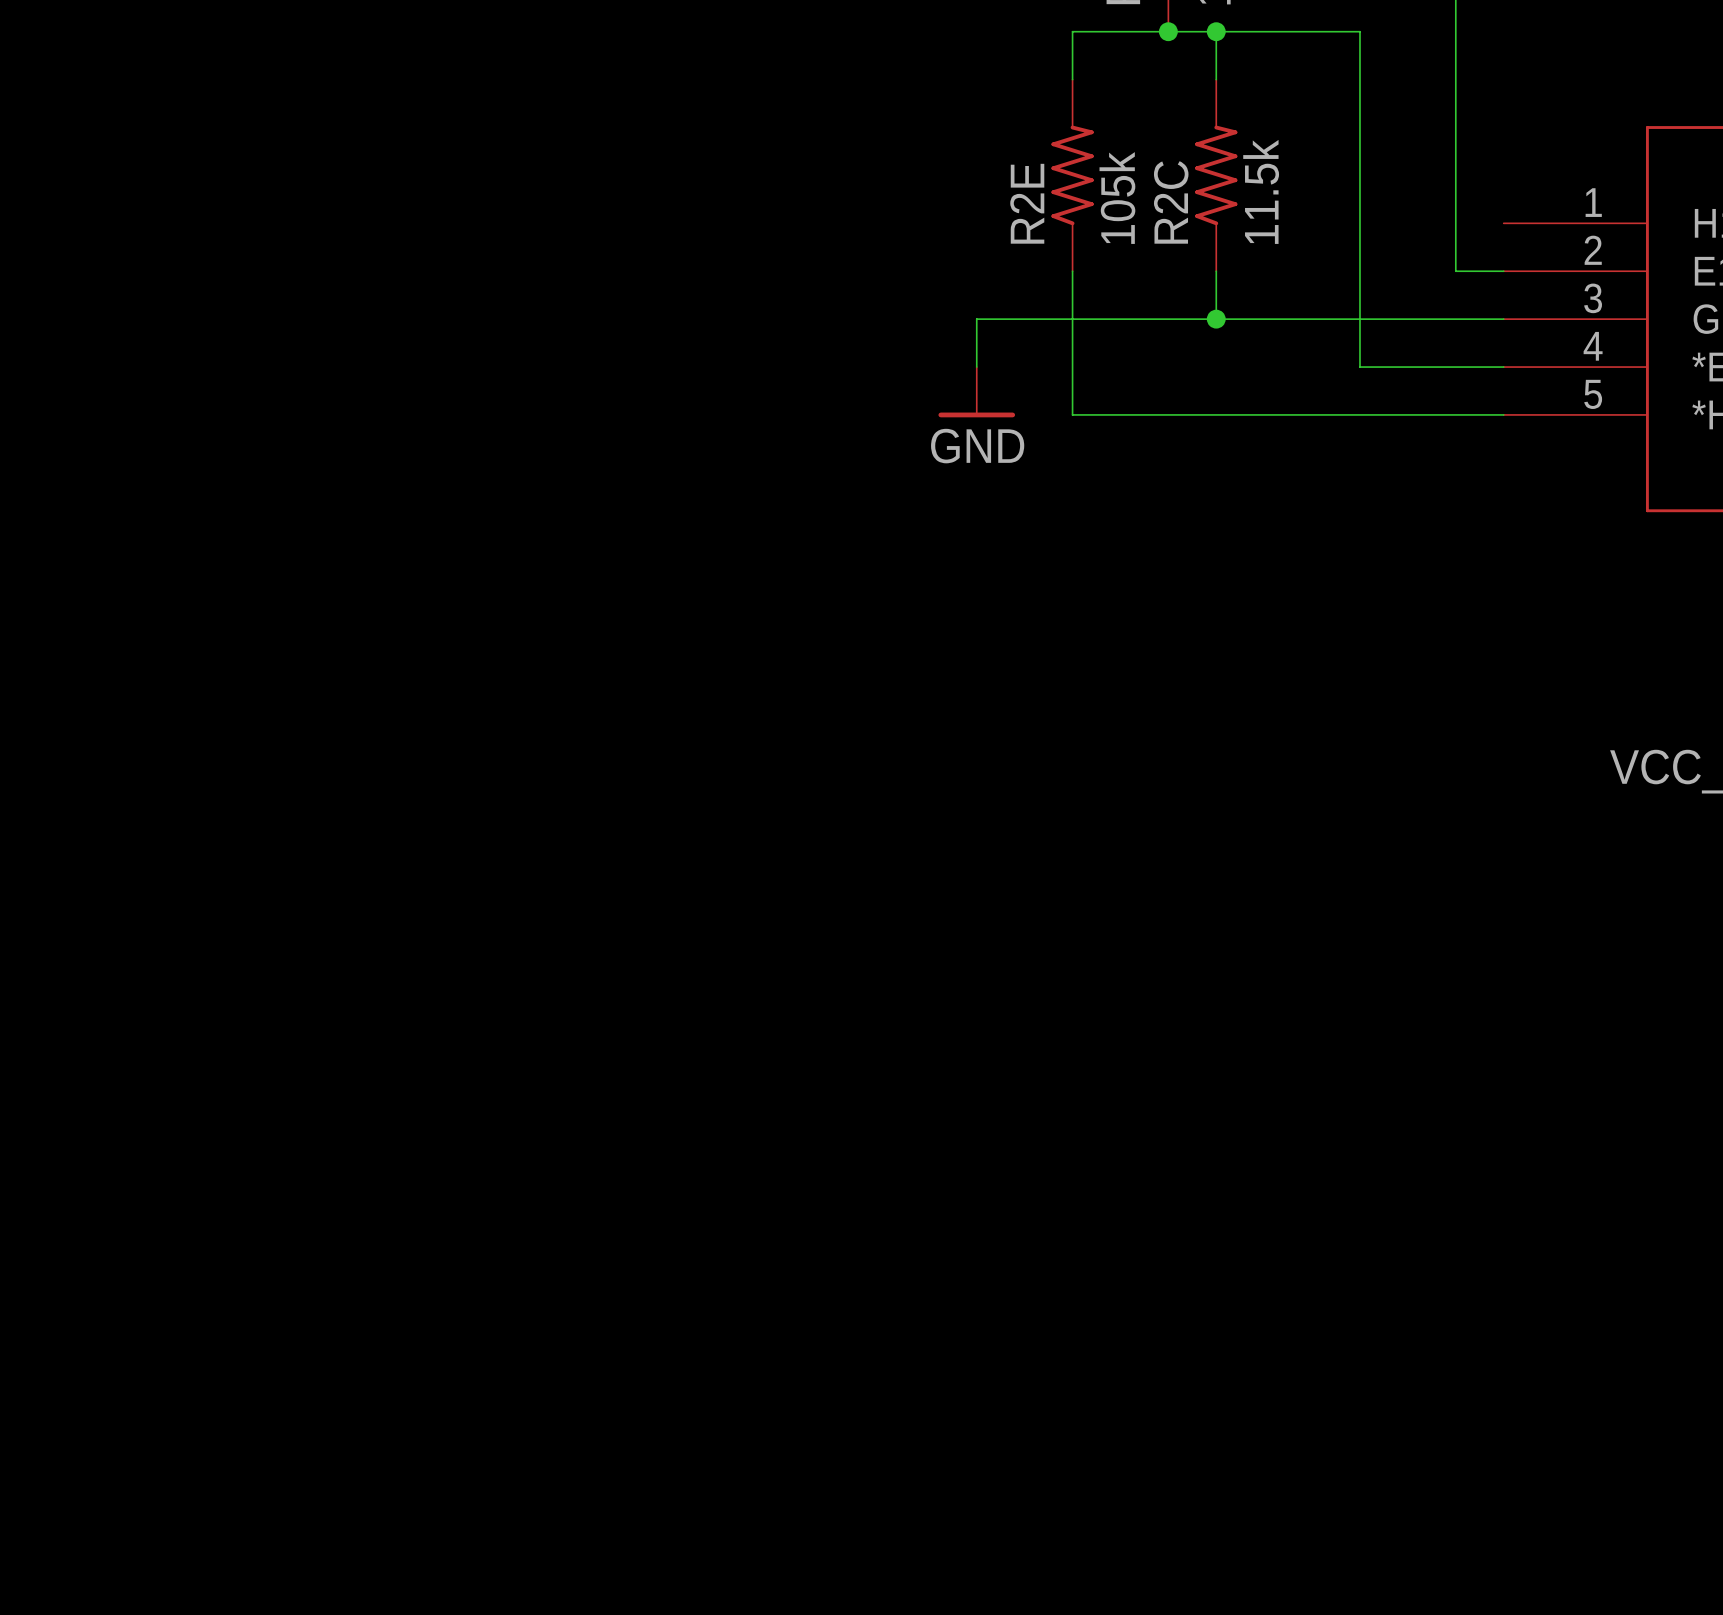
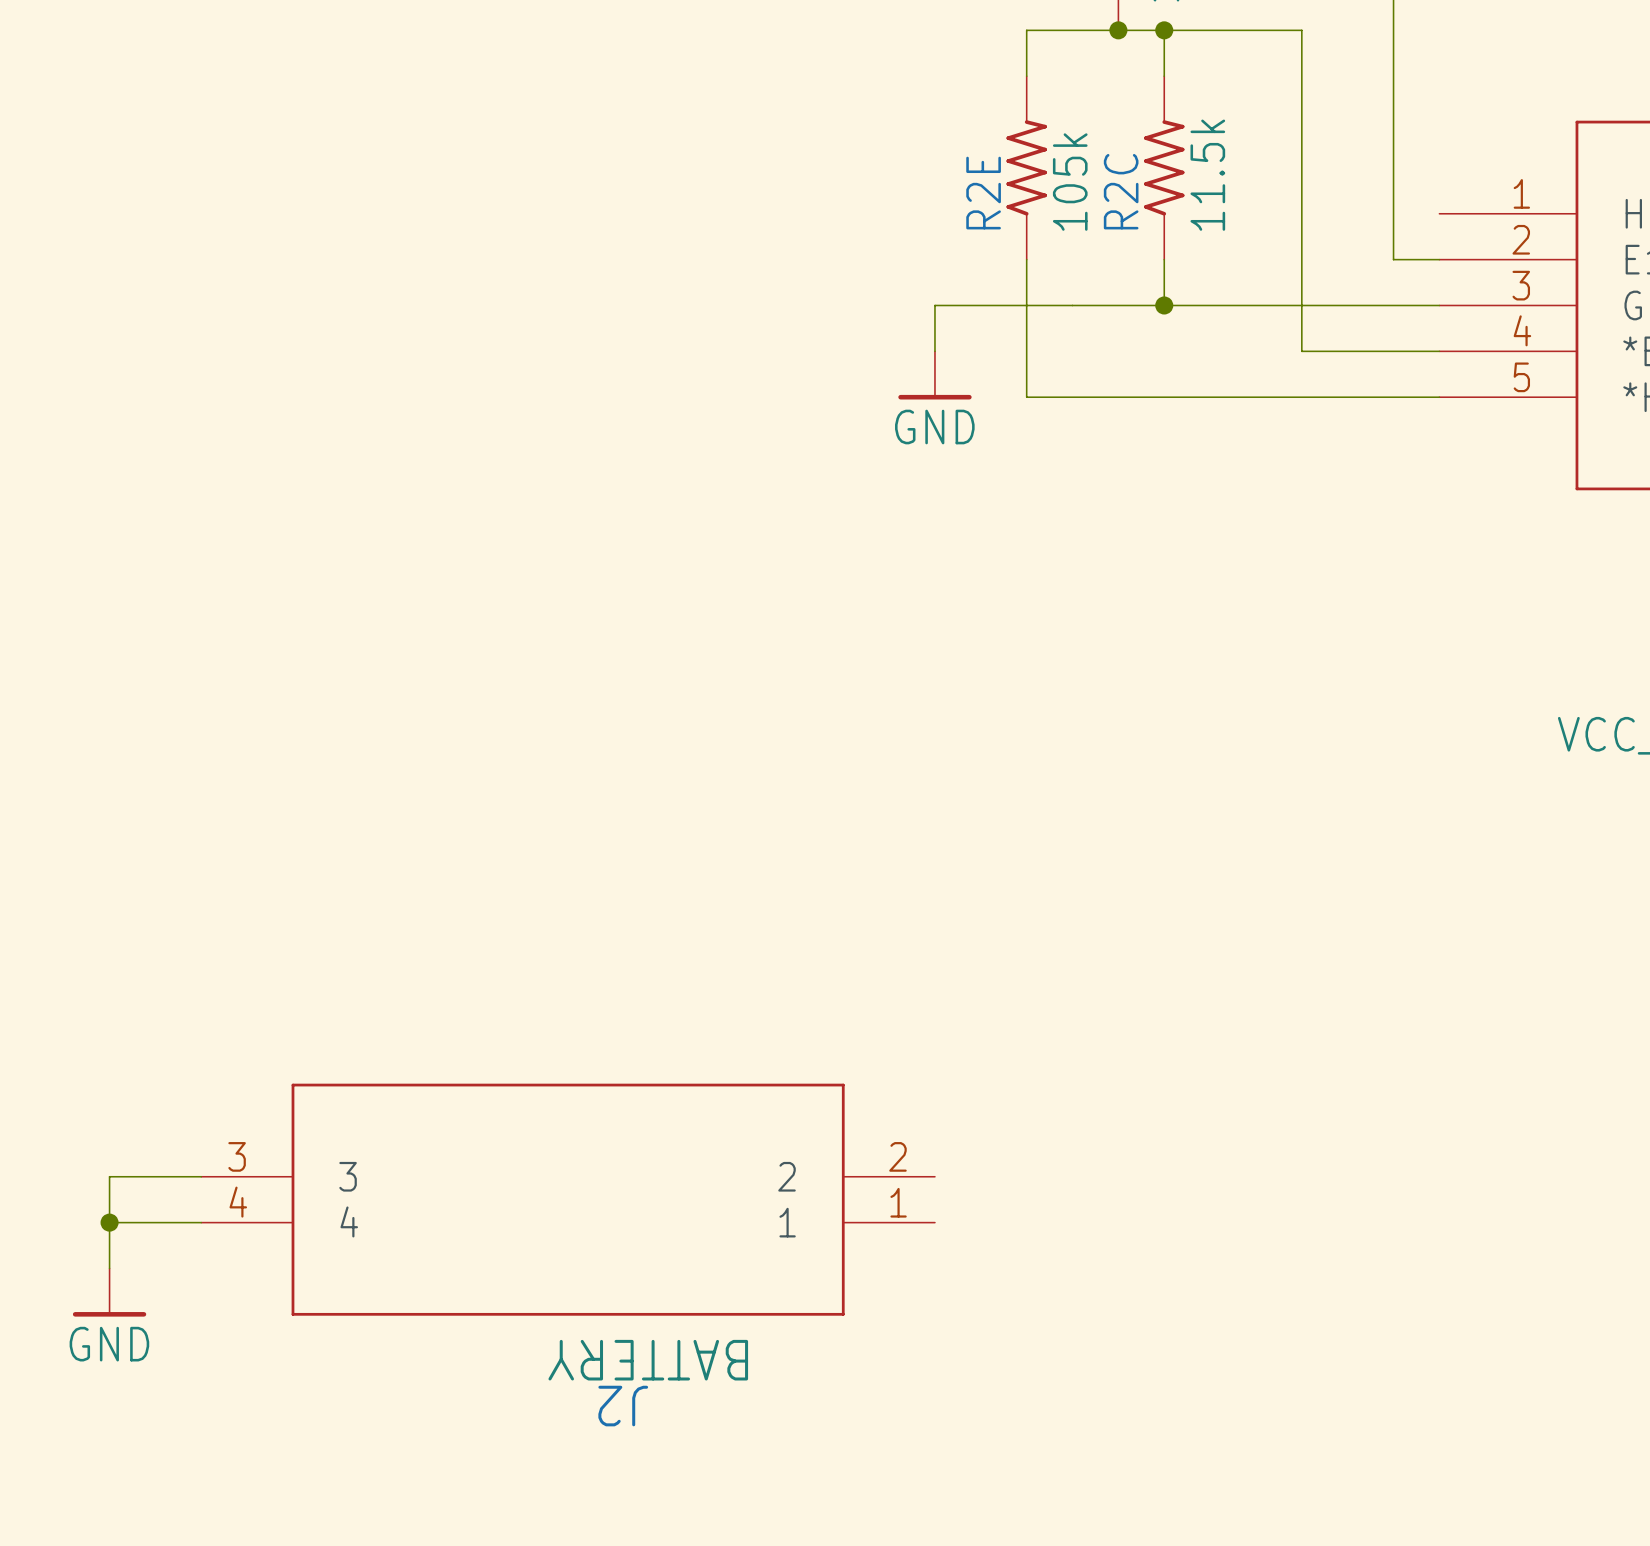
wire: none -> (201, 1176) (109, 1176) (109, 1268)
J2: none -> BATTERY (568, 1199)
wire: none -> (109, 1222) (201, 1222)
junction: none -> (109, 1222)
power symbol: none -> GND (109, 1292)

